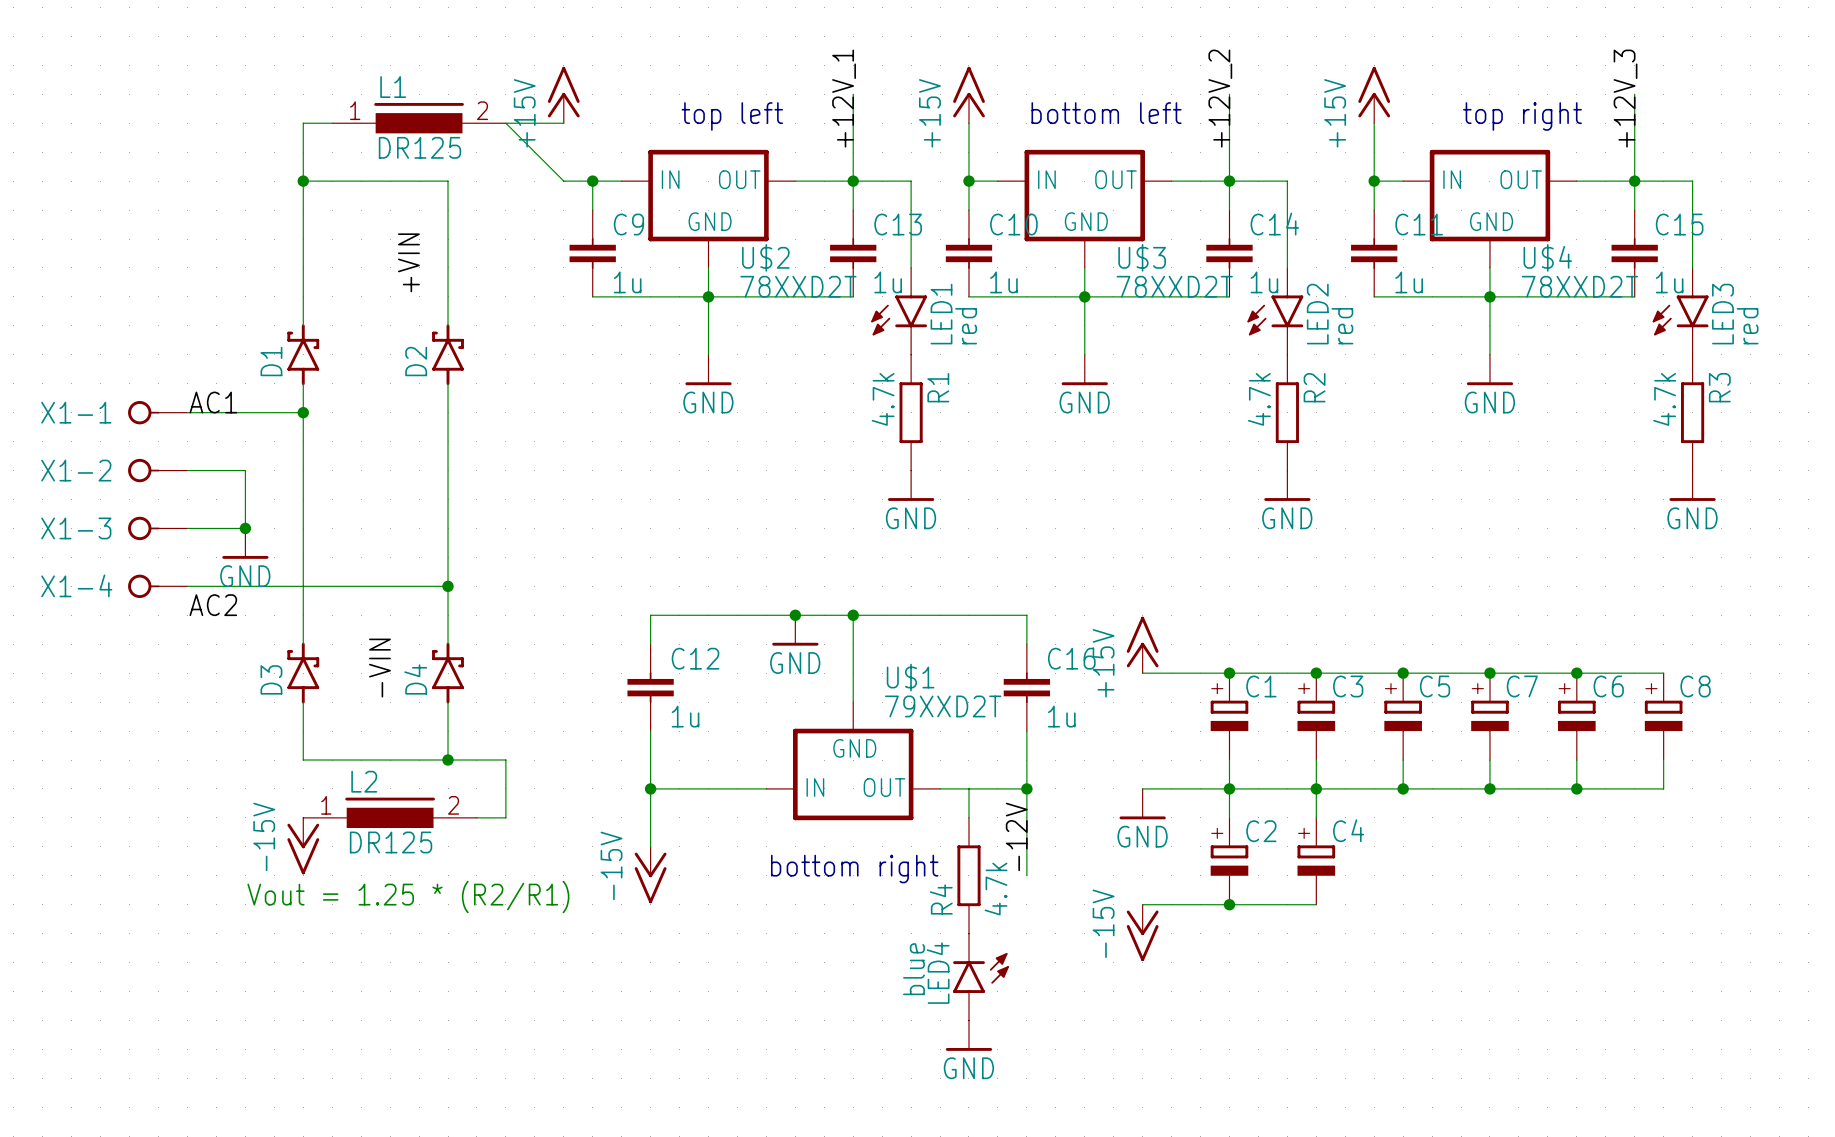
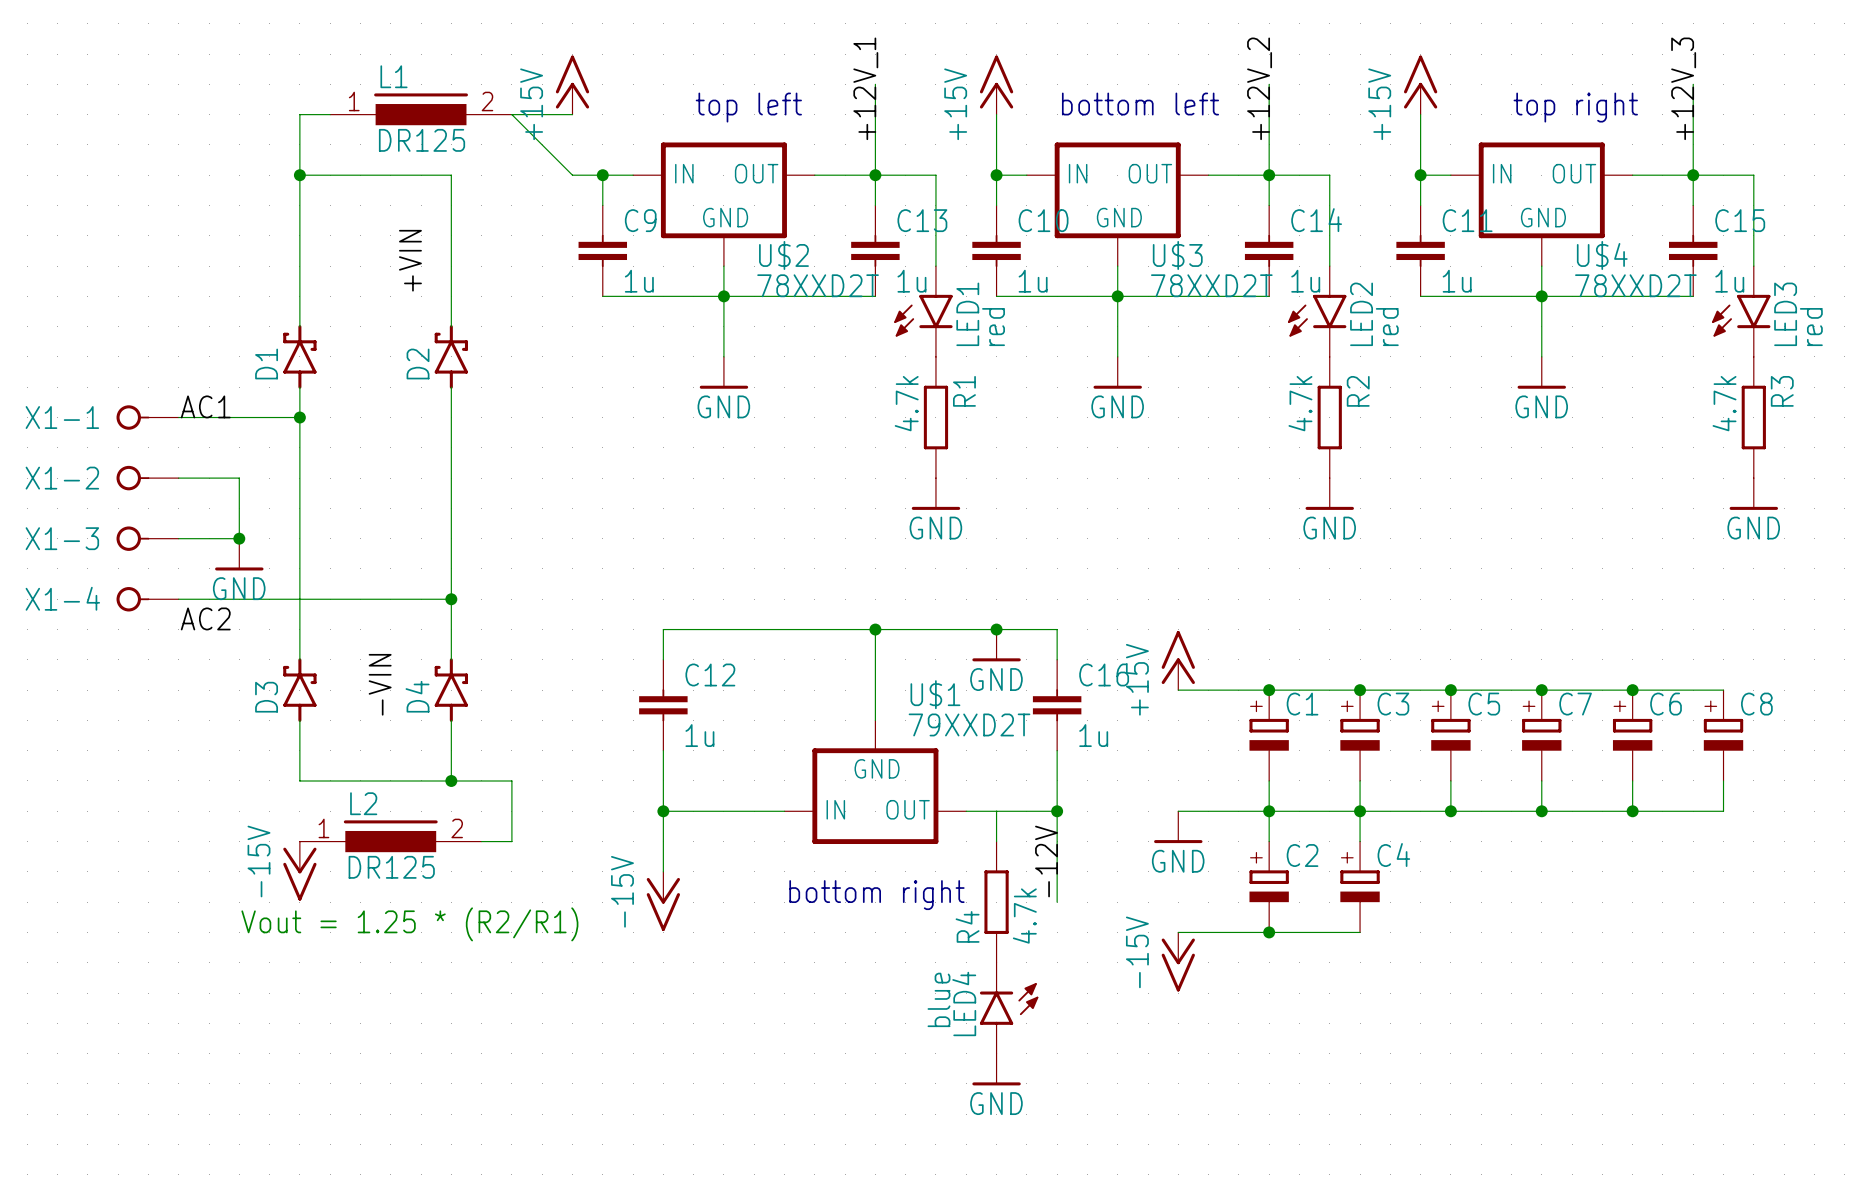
junction: (795, 615) -> none
junction: none -> (996, 629)
power symbol position: GND (795, 630) -> GND (996, 645)

